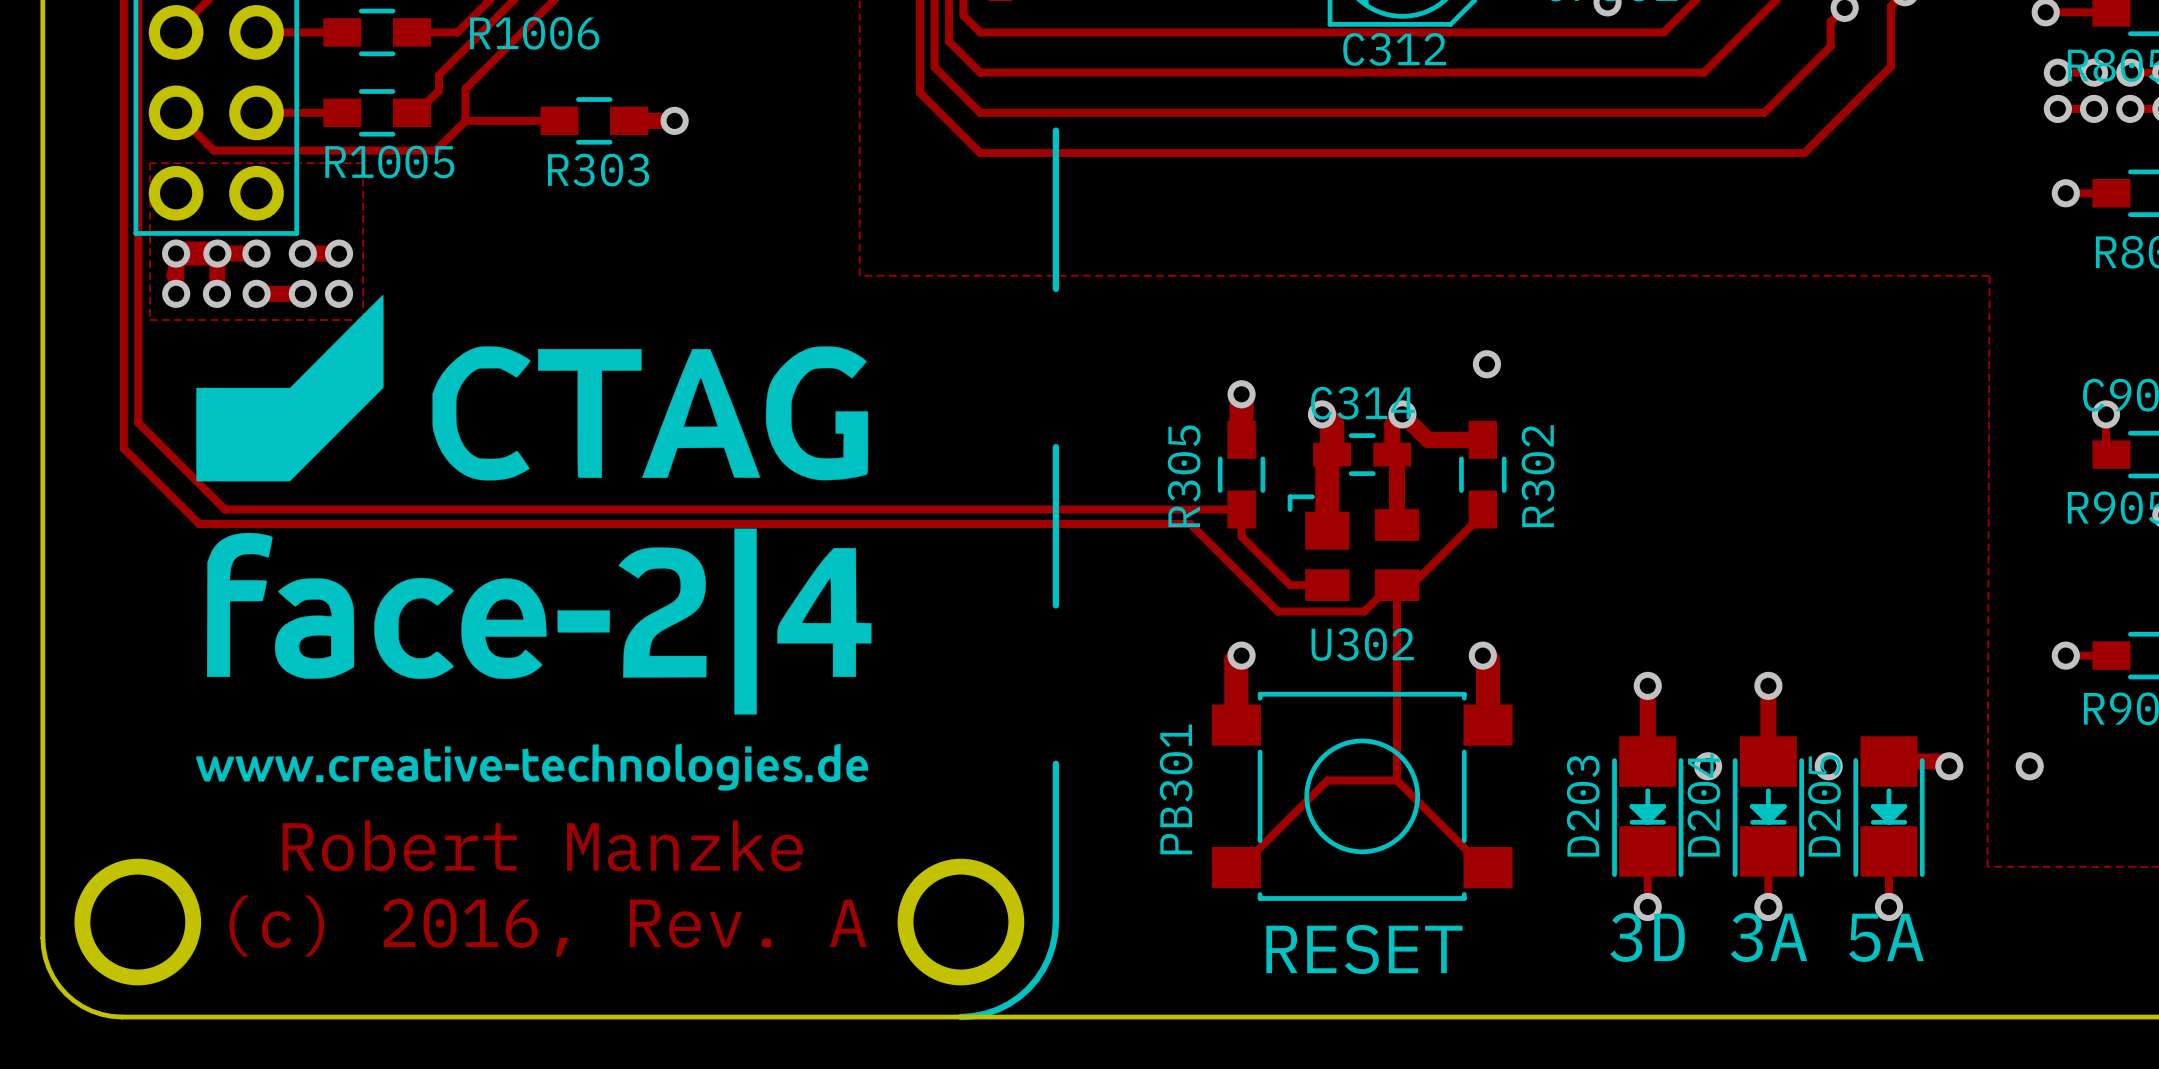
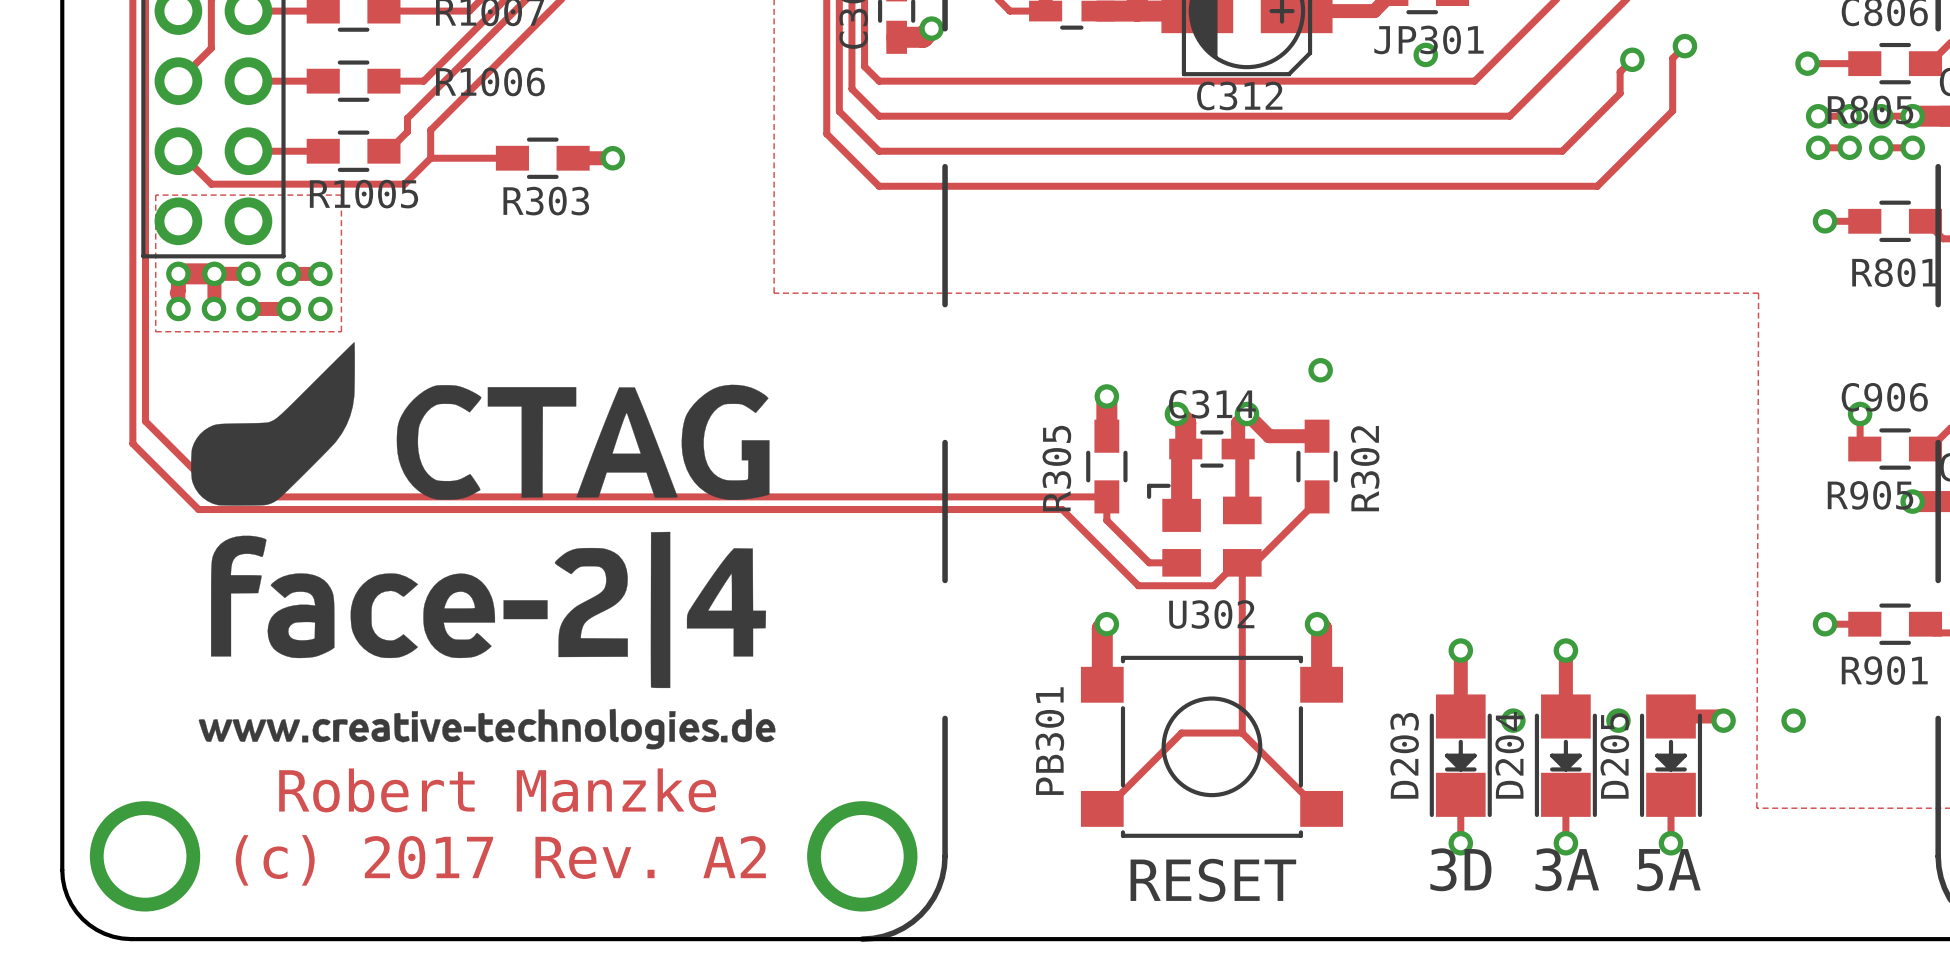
drawing shape: [195, 294, 872, 791] -> [191, 342, 776, 750]
text: (c) 2016, Rev. A (548, 926) -> (c) 2017 Rev. A2 (500, 860)

